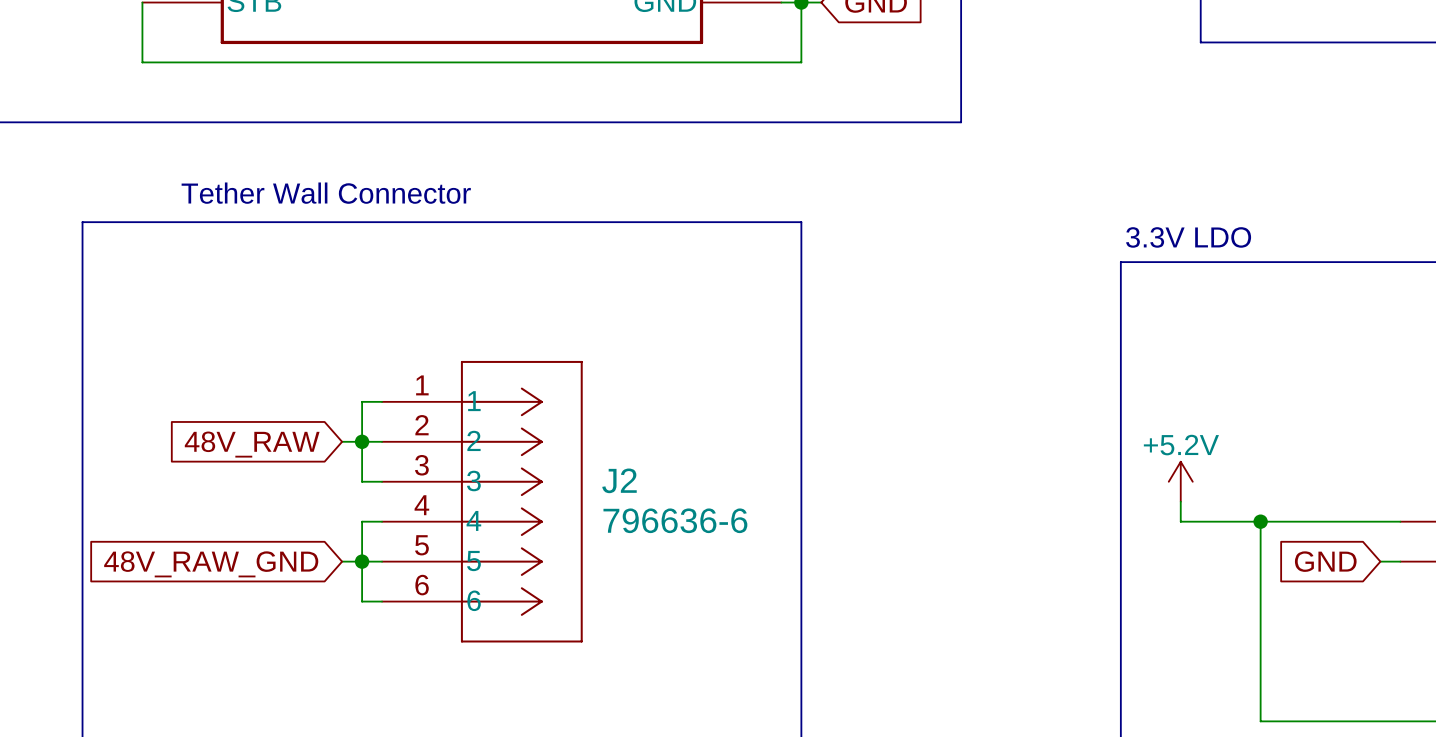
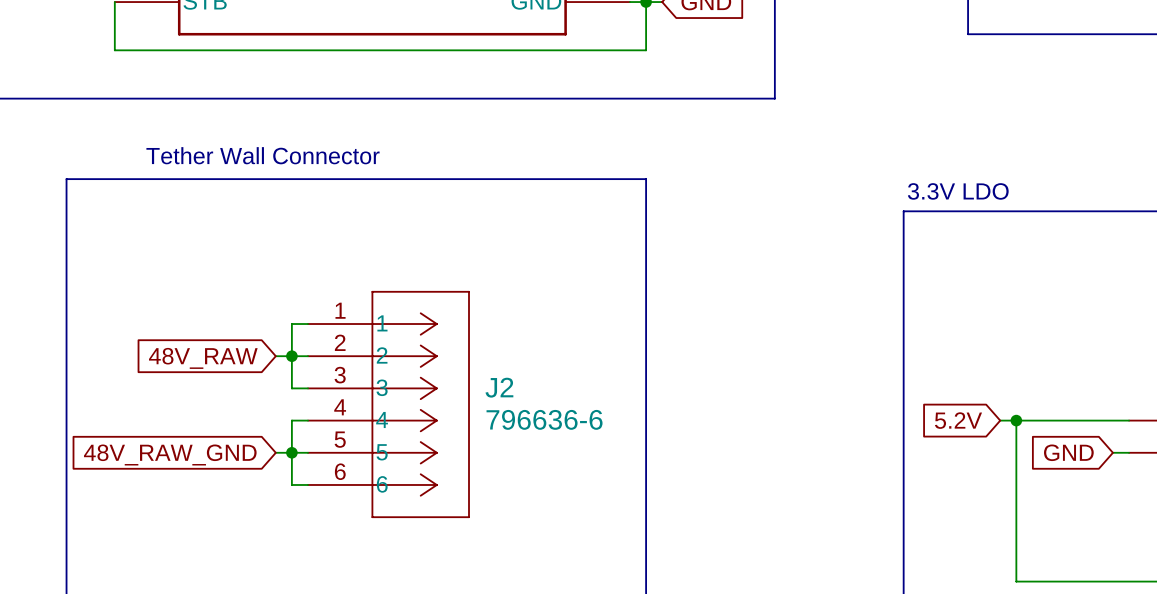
power symbol: +5.2V (1180, 481) -> none
wire: (1180, 501) (1180, 521) (1240, 521) -> none
global label: none -> 5.2V (958, 420)

